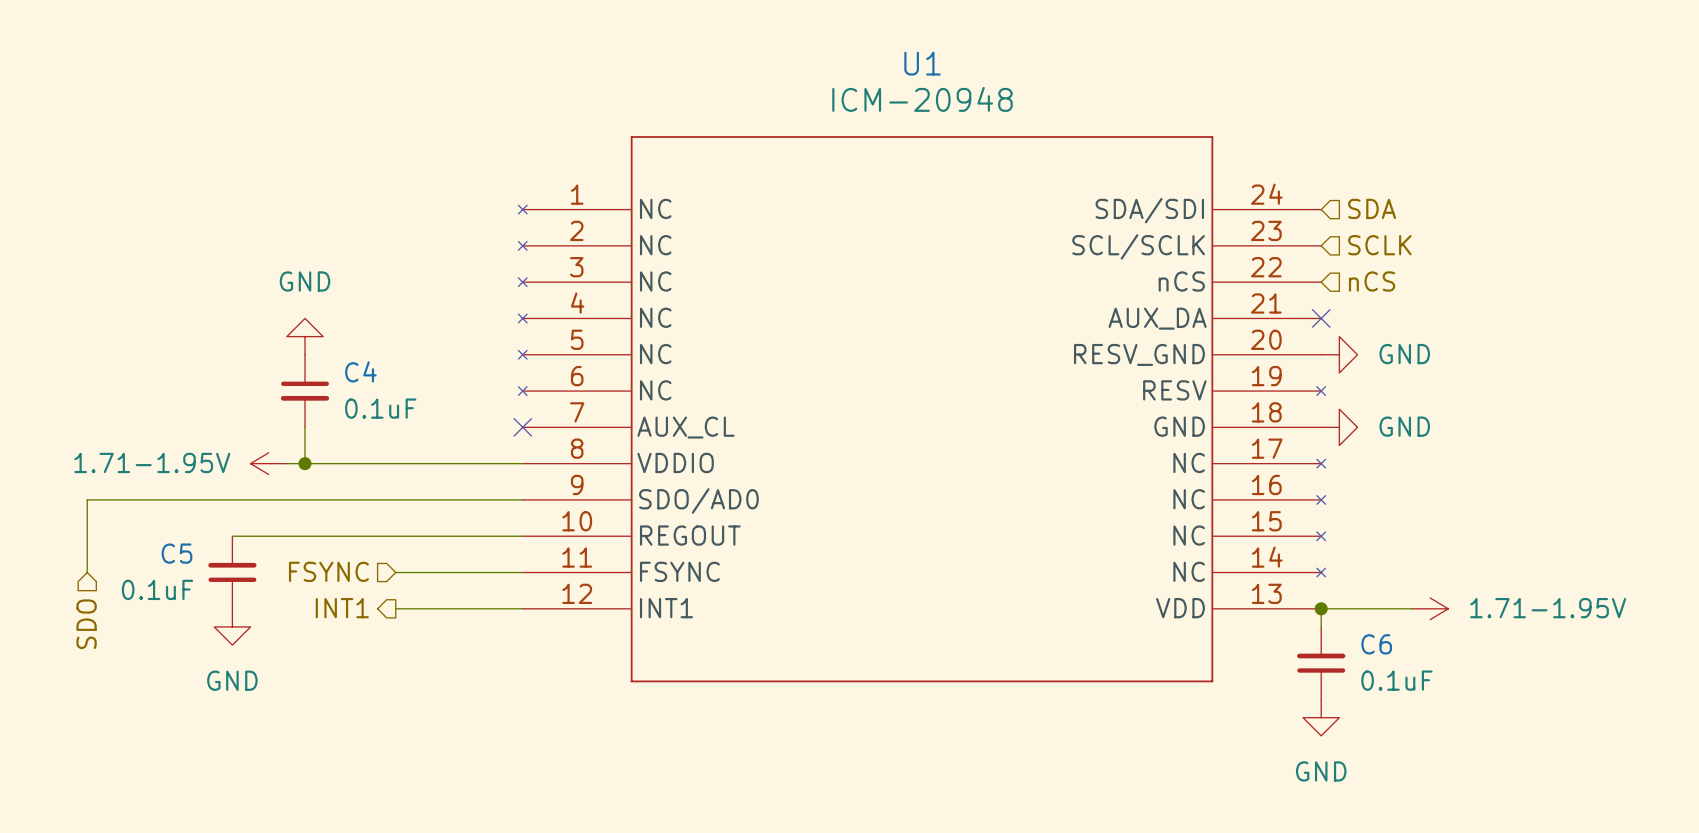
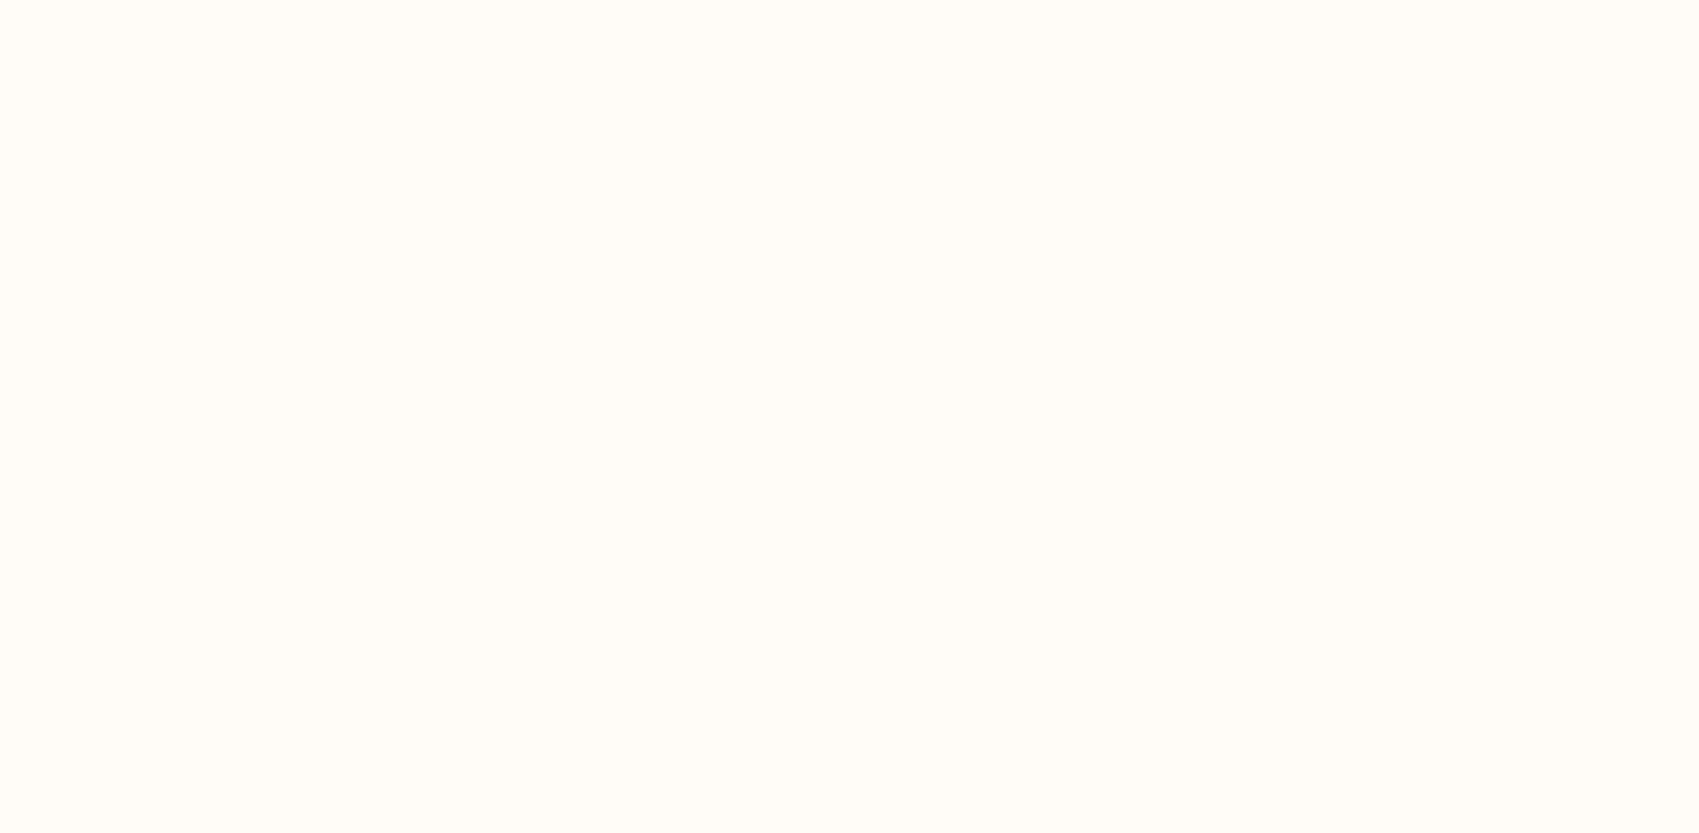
hierarchical label: SDA (1372, 208) -> none
hierarchical label: SCLK (1379, 245) -> none
hierarchical label: nCS (1372, 281) -> none
no-connect mark: (1321, 318) -> none
power symbol: GND (305, 336) -> none
power symbol: GND (1339, 354) -> none
C4: 0.1uF (305, 391) -> none
U1: ICM-20948 (921, 409) -> none
wire: (305, 427) (305, 463) -> none
no-connect mark: (522, 427) -> none
power symbol: GND (1339, 427) -> none
power symbol: 1.71-1.95V (268, 463) -> none
wire: (286, 463) (522, 463) -> none
junction: (305, 463) -> none
wire: (522, 499) (87, 499) (87, 572) -> none
wire: (232, 536) (522, 536) -> none
hierarchical label: FSYNC (328, 571) -> none
C5: 0.1uF (232, 572) -> none
wire: (395, 572) (522, 572) -> none
hierarchical label: INT1 (342, 608) -> none
wire: (395, 608) (522, 608) -> none
junction: (1321, 608) -> none
wire: (1411, 608) (1321, 608) (1321, 626) -> none
power symbol: 1.71-1.95V (1430, 608) -> none
hierarchical label: SDO (86, 624) -> none
power symbol: GND (232, 626) -> none
C6: 0.1uF (1321, 663) -> none
power symbol: GND (1321, 717) -> none

